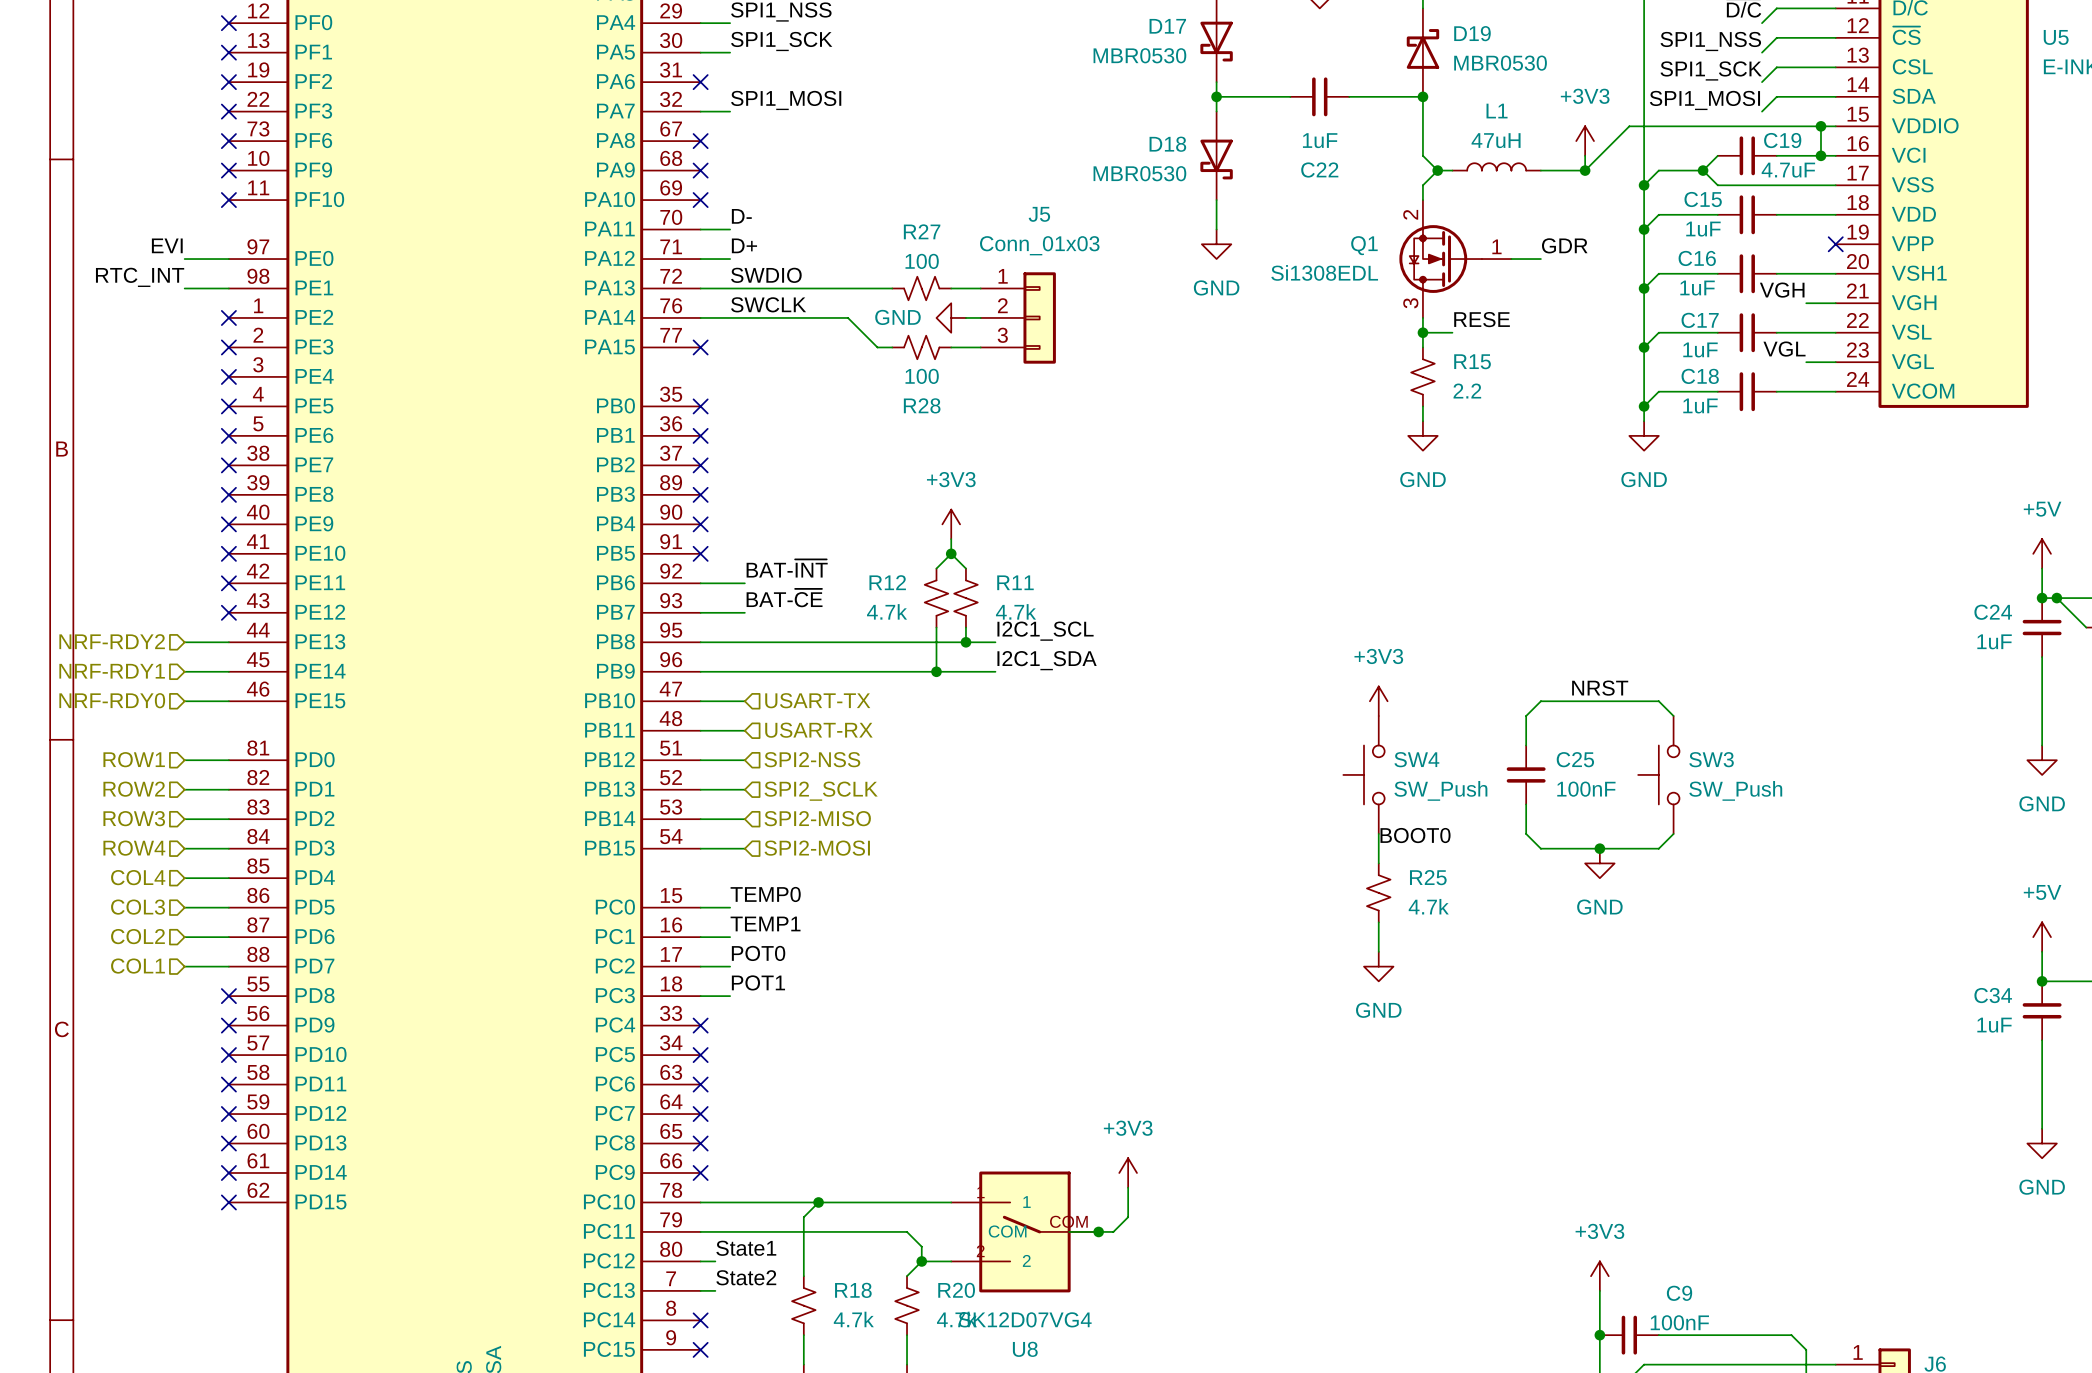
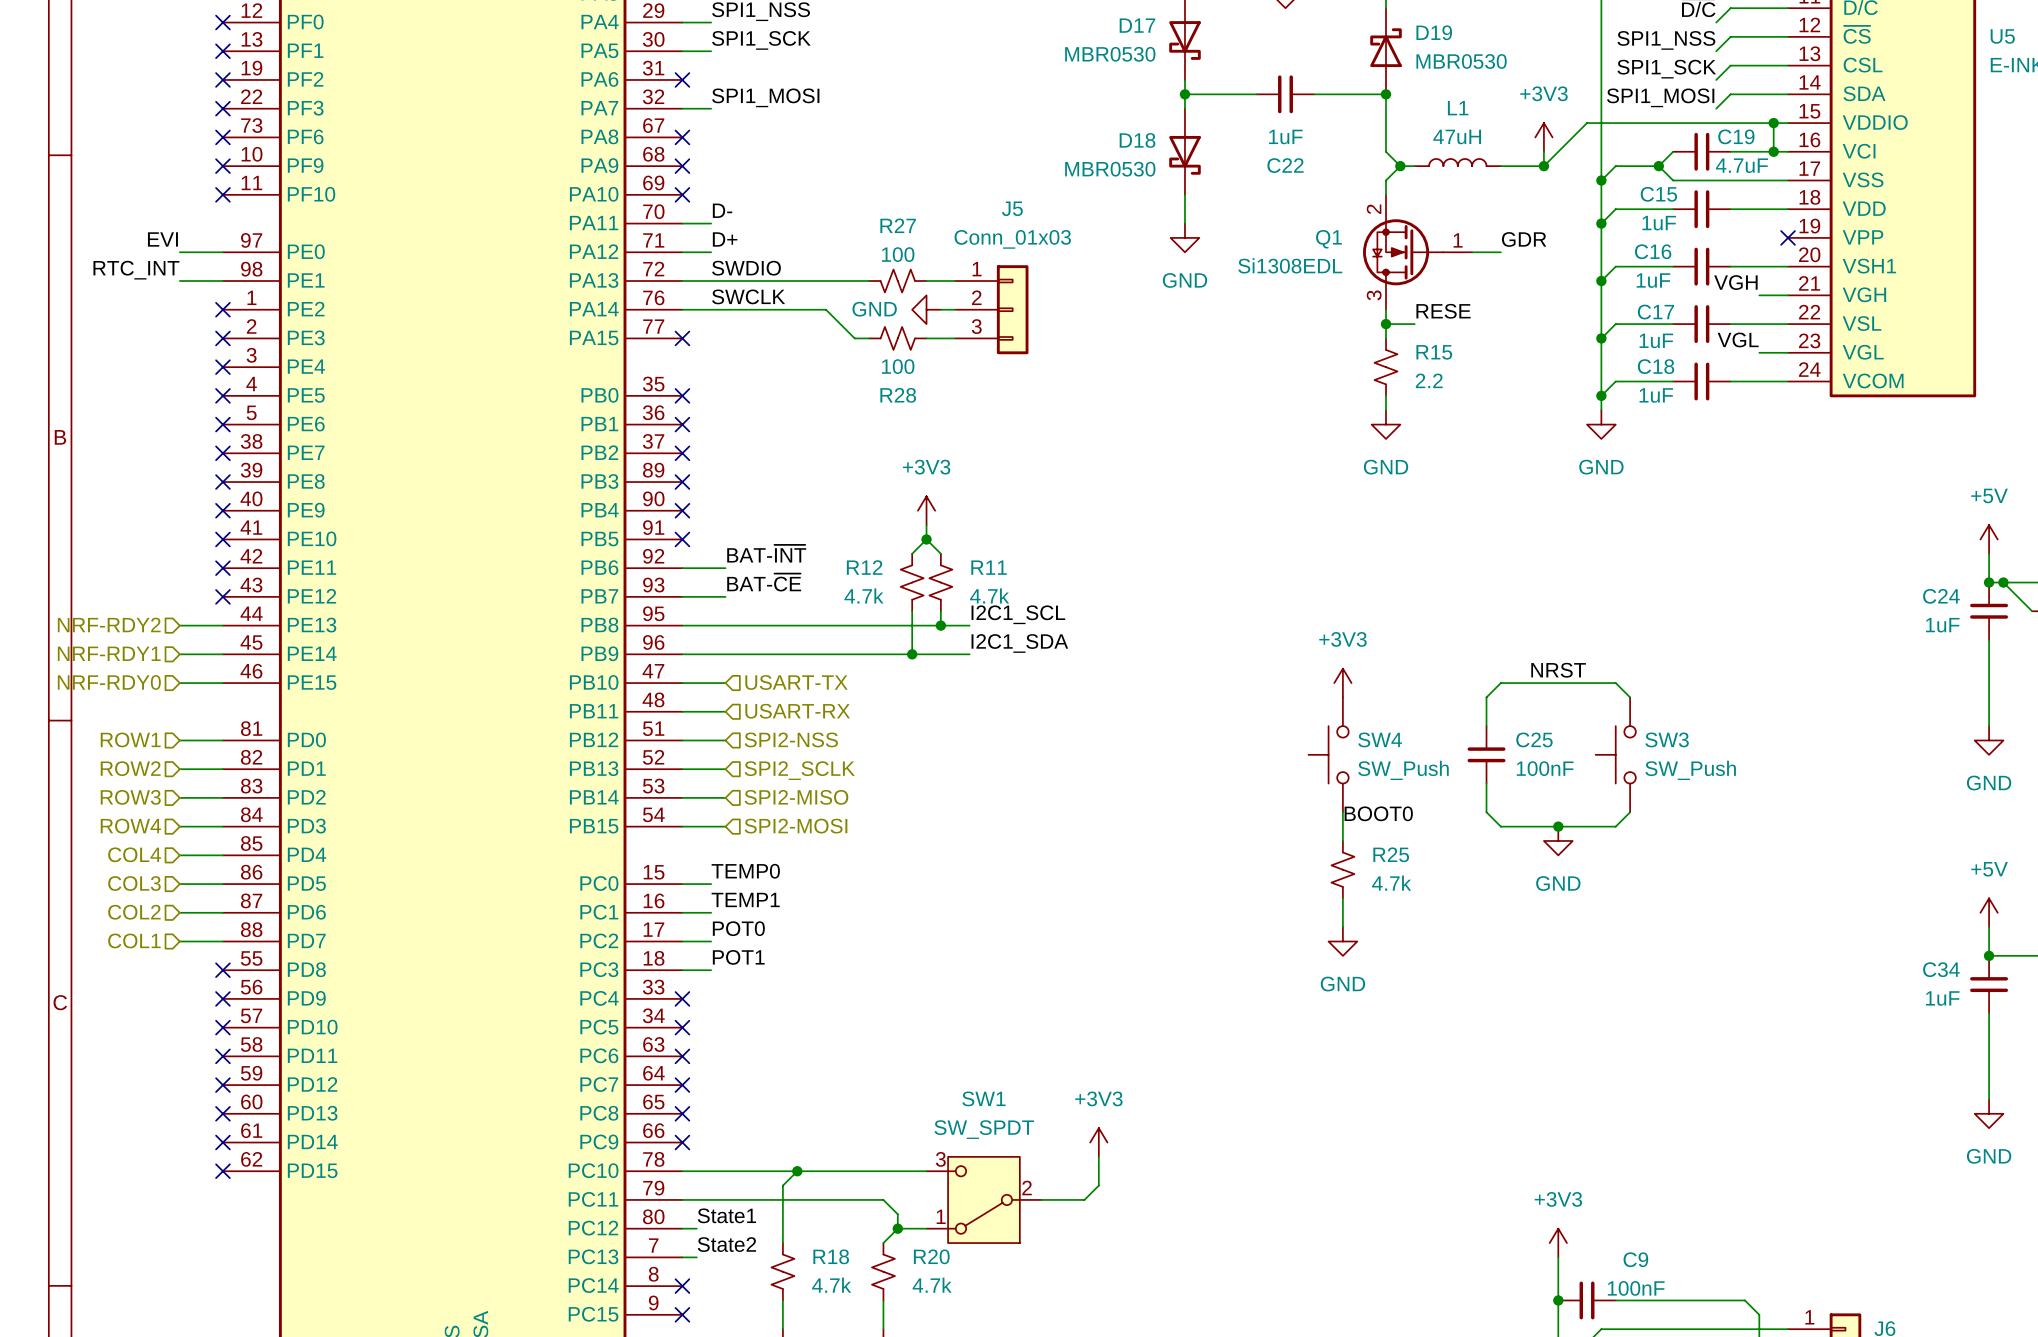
SW1: none -> SW_SPDT (983, 1199)
U8: SK12D07VG4 (1024, 1231) -> none
junction: (1098, 1231) -> none

